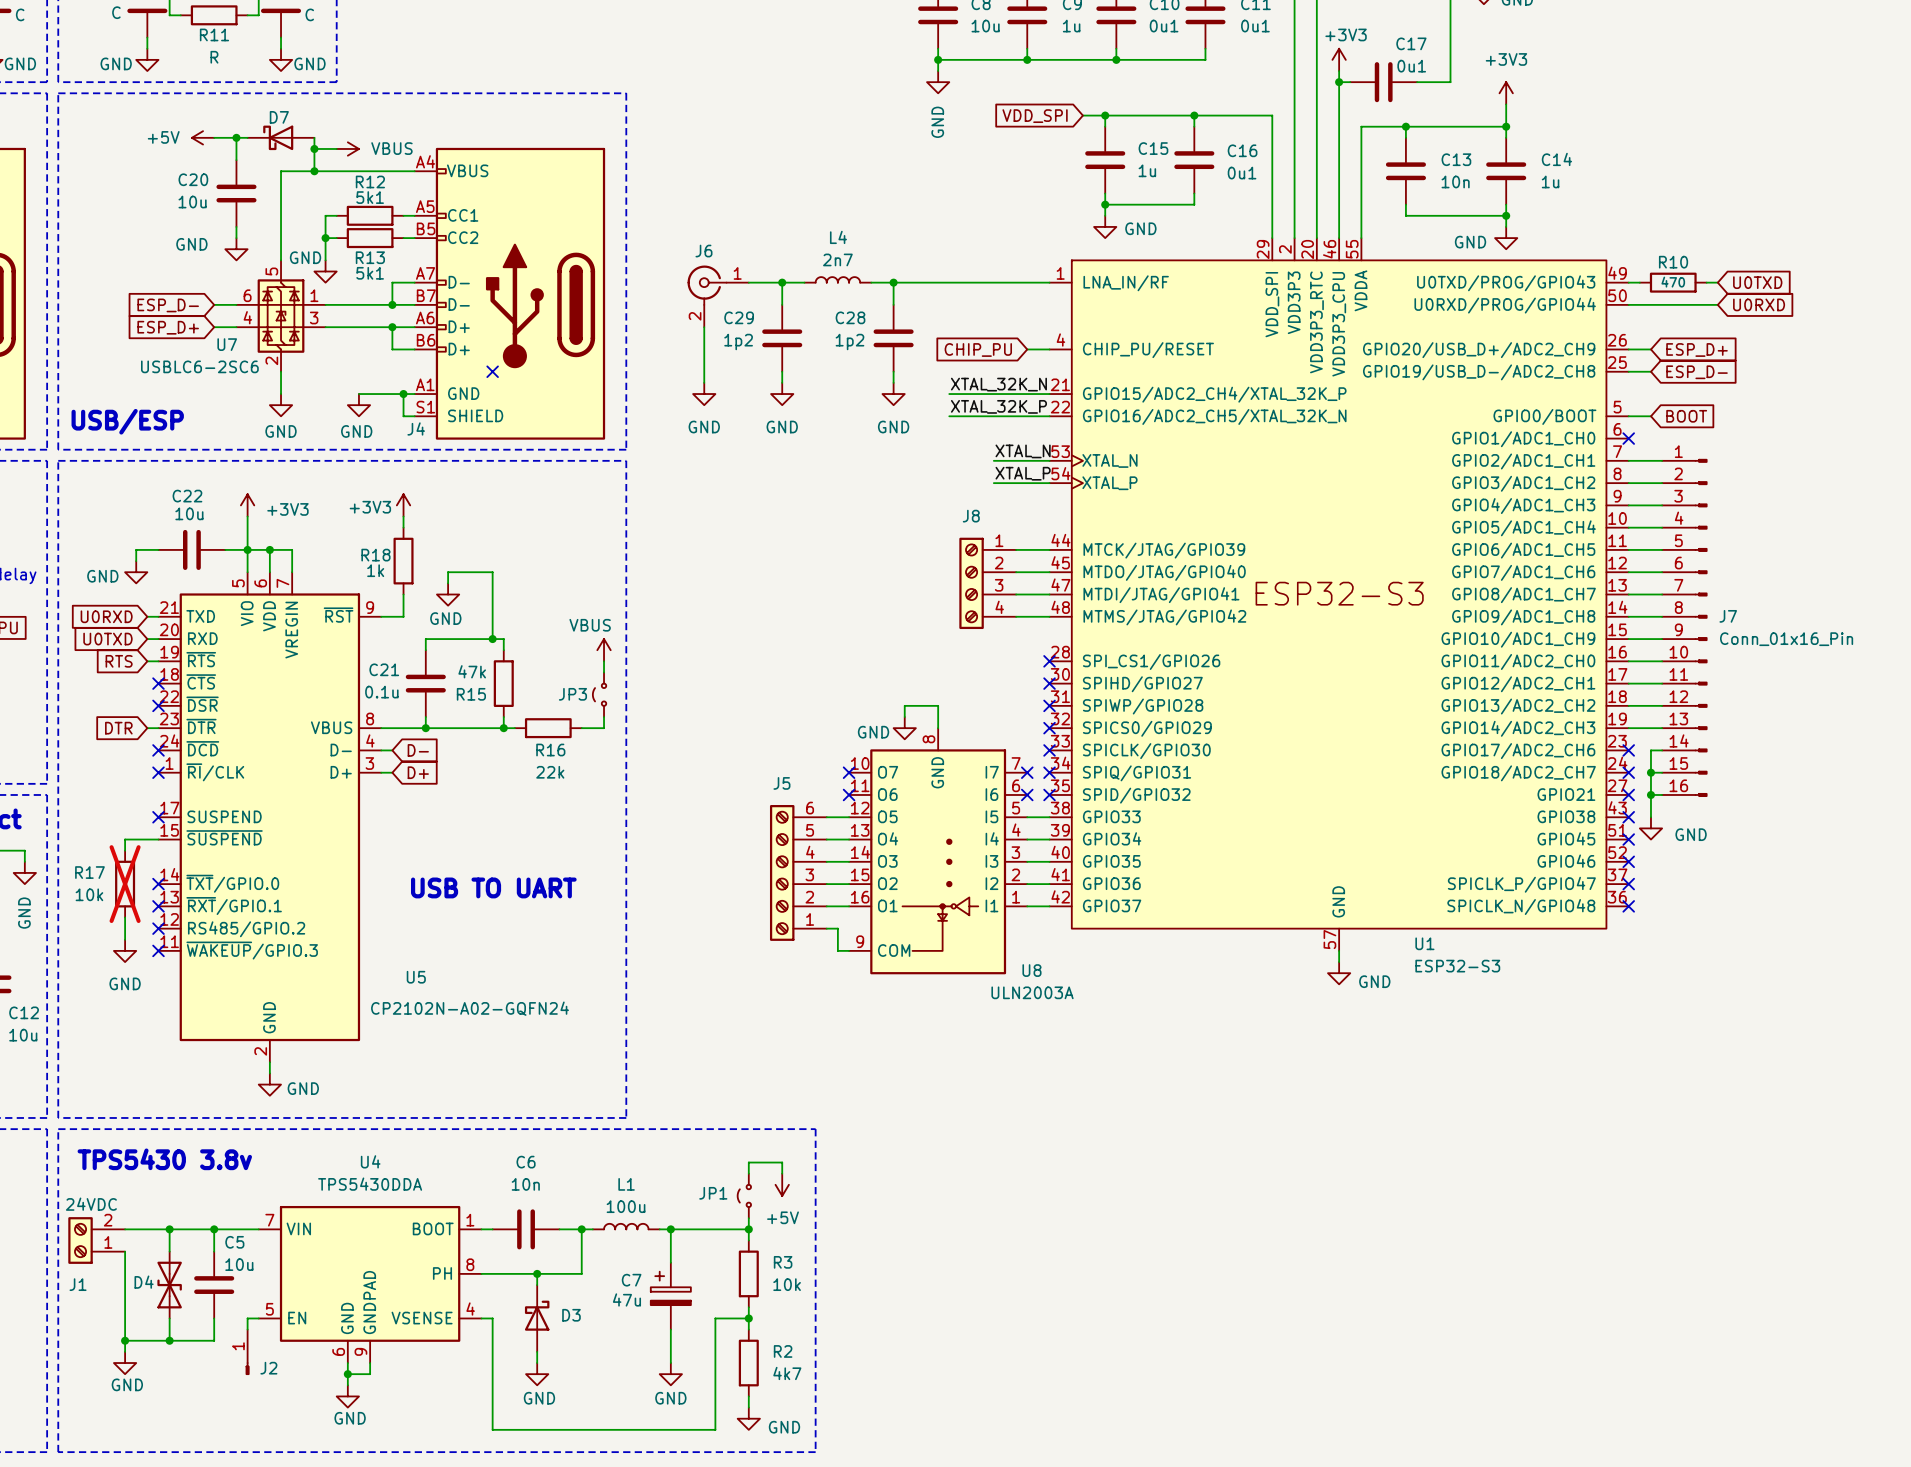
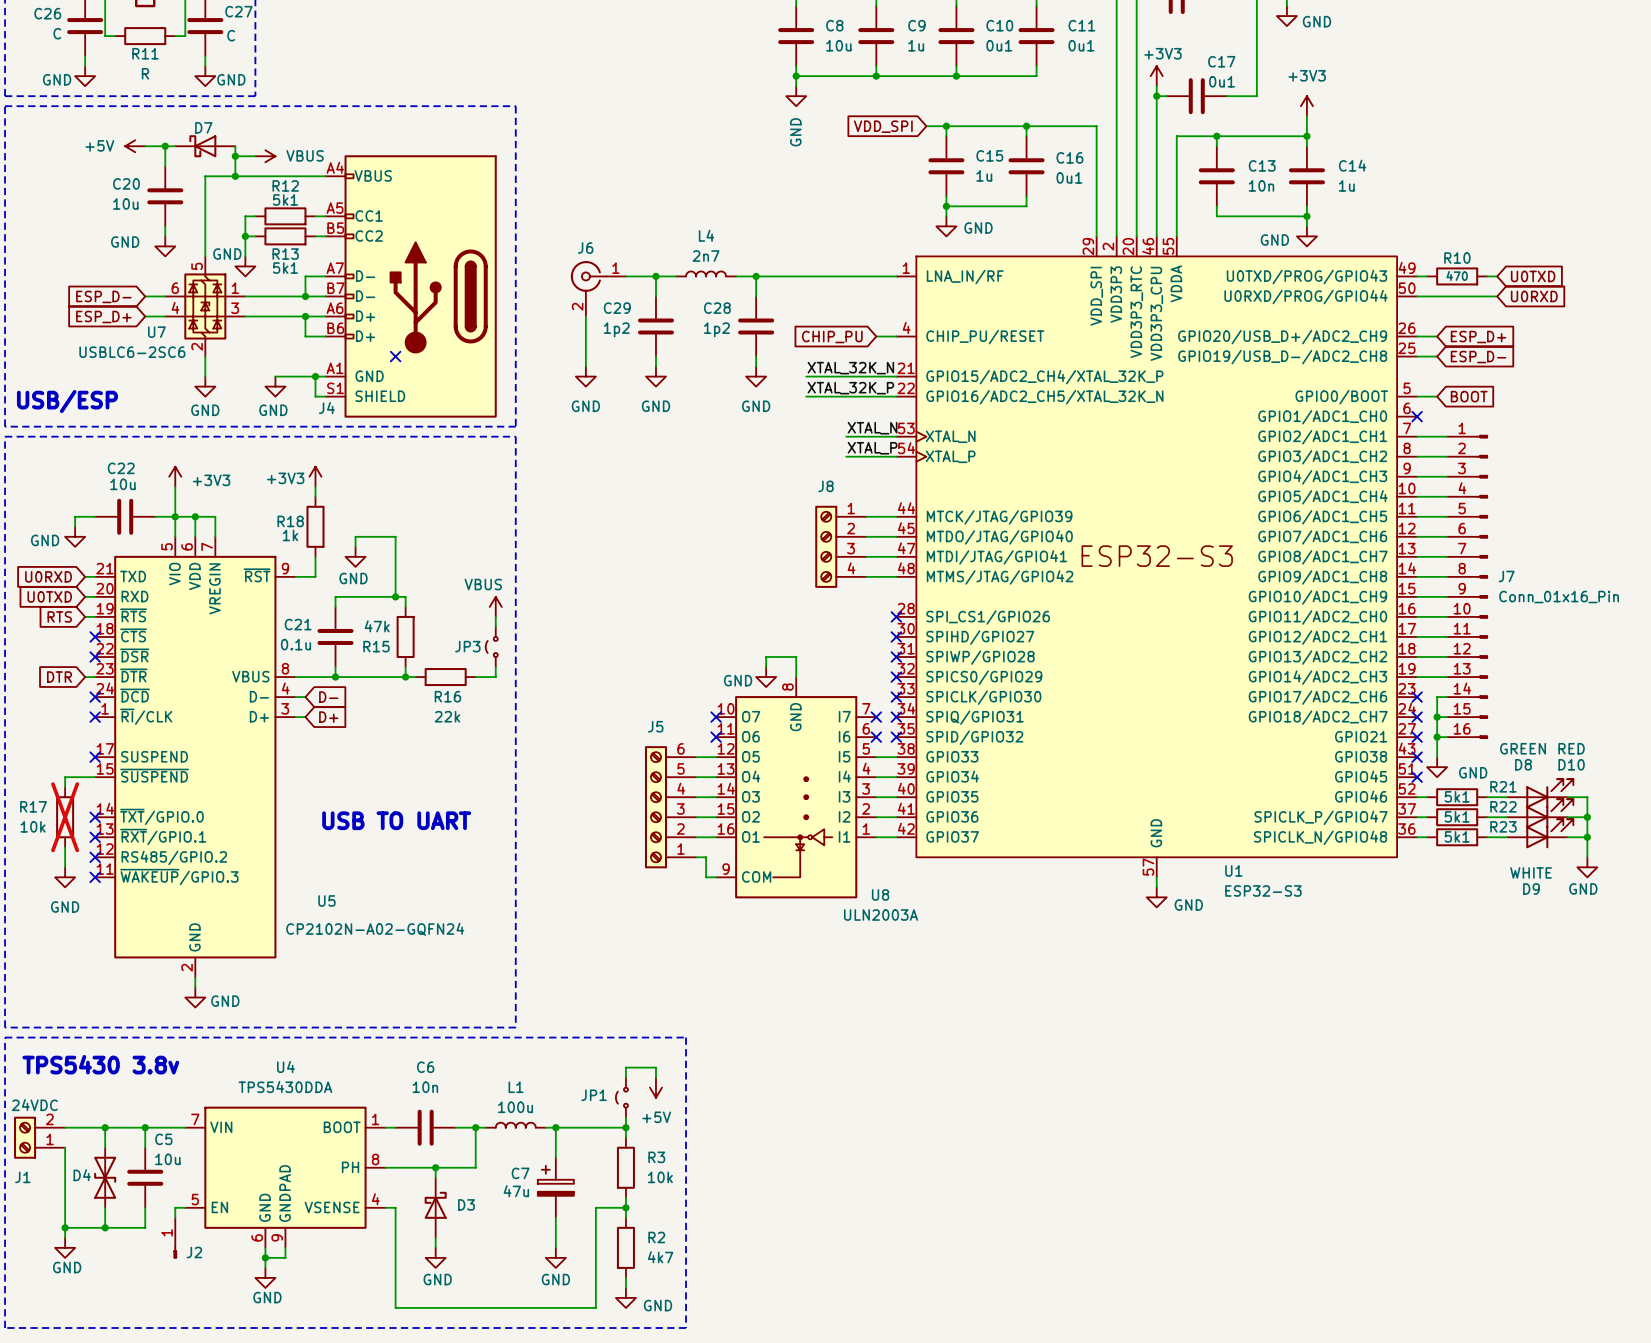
D8: none -> GREEN (1540, 793)
wire: none -> (1417, 797) (1427, 797)
no-connect mark: (1628, 861) -> none
R21: none -> 5k1 (1457, 797)
wire: none -> (1487, 797) (1507, 797)
wire: none -> (1567, 797) (1587, 797) (1587, 857)
D9: none -> WHITE (1540, 813)
wire: none -> (1417, 817) (1427, 817)
no-connect mark: (1628, 884) -> none
R22: none -> 5k1 (1457, 817)
wire: none -> (1487, 817) (1507, 817)
wire: none -> (1567, 817) (1587, 817)
junction: none -> (1587, 817)
D10: none -> RED (1540, 833)
wire: none -> (1417, 837) (1427, 837)
no-connect mark: (1628, 906) -> none
R23: none -> 5k1 (1457, 837)
wire: none -> (1487, 837) (1507, 837)
wire: none -> (1567, 837) (1587, 837)
junction: none -> (1587, 837)
power symbol: none -> GND (1587, 867)

